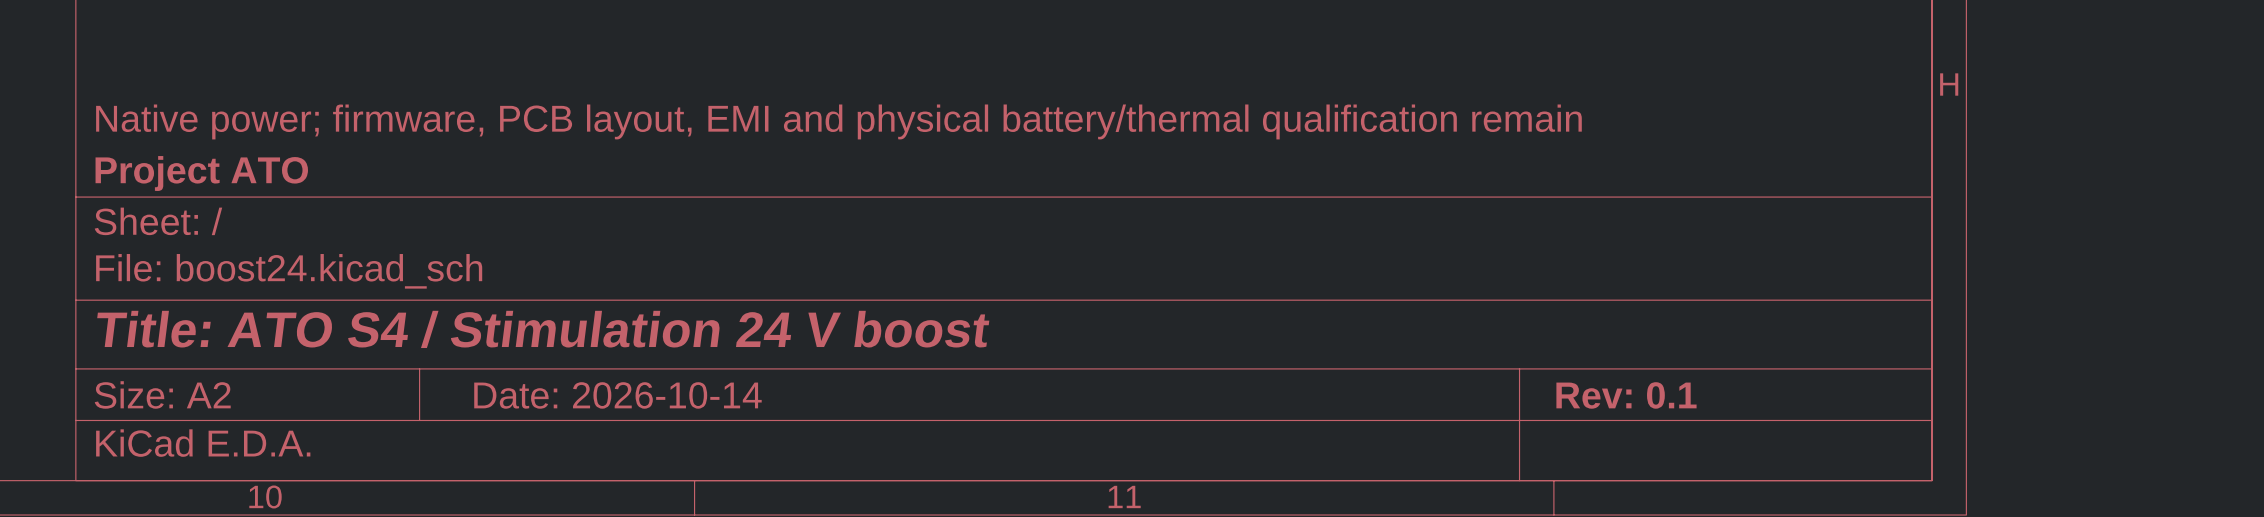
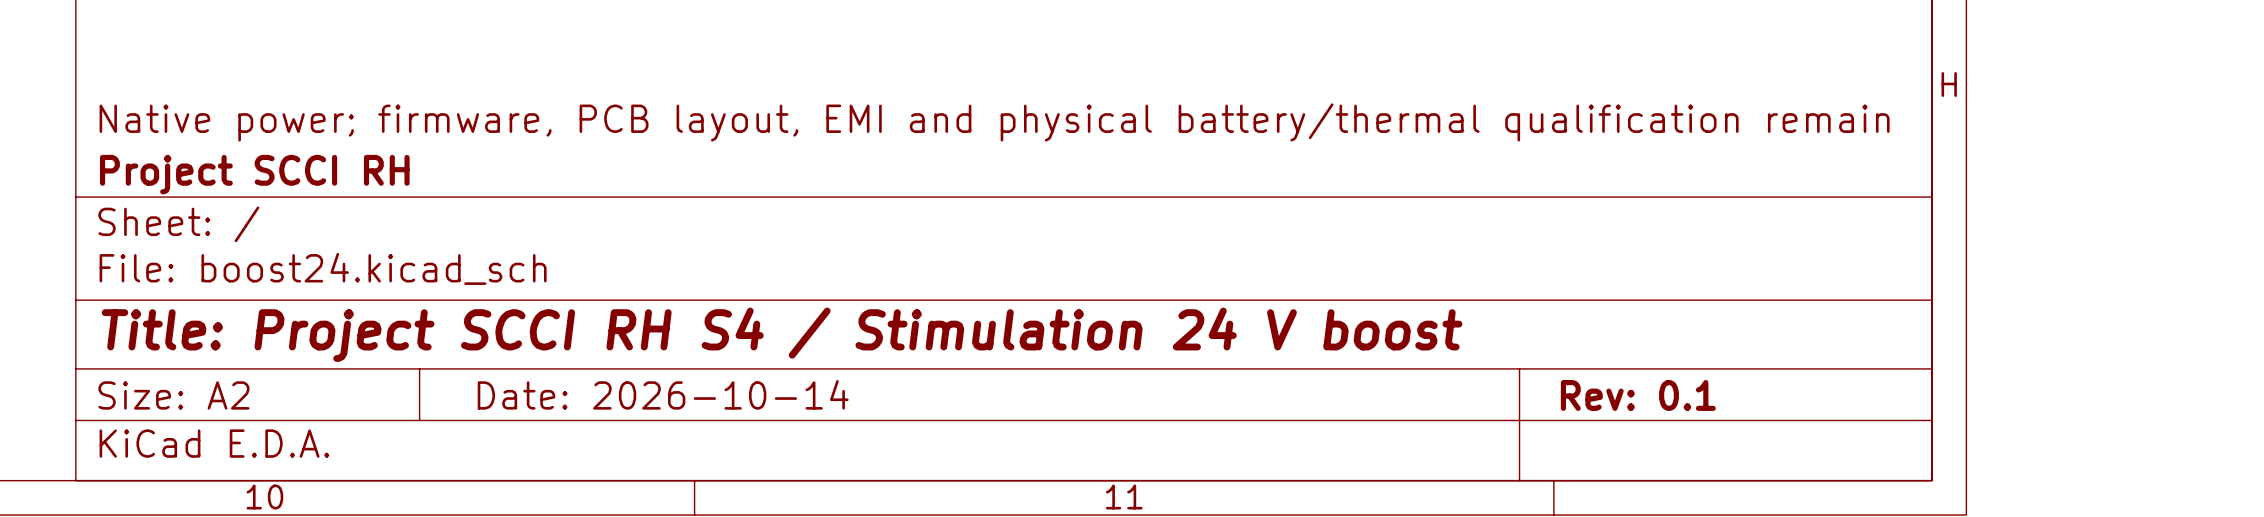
title block: Project ATO (201, 173) -> Project SCCI RH (254, 174)
title block: Title: ATO S4 / Stimulation 24 V boost (543, 329) -> Title: Project SCCI RH S4 / Stimulation 24 V boost (782, 334)

